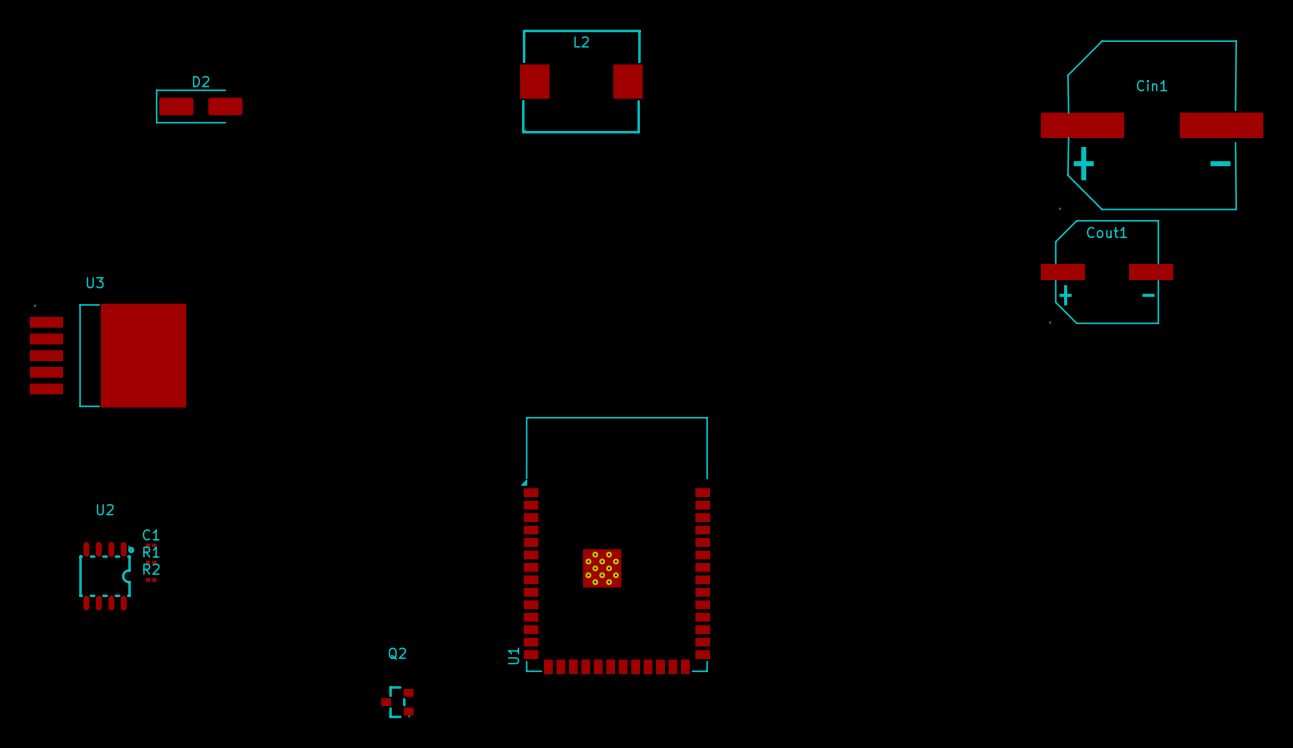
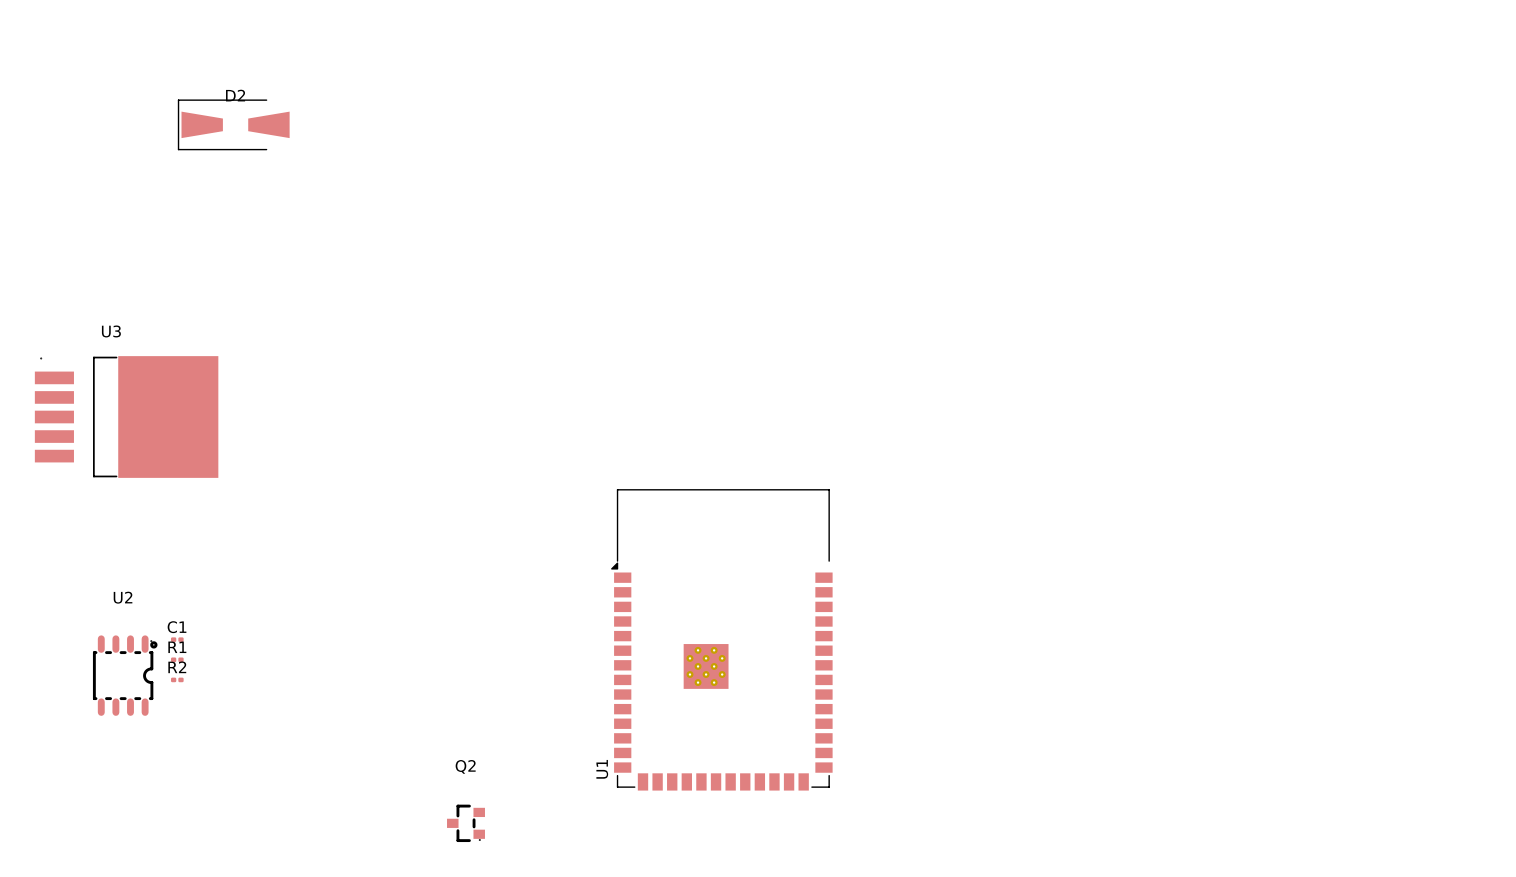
L2: (581, 81) -> none
D2 footprint: [156, 89, 243, 124] -> [177, 99, 290, 151]
Cin1: (1152, 125) -> none
Cout1: (1107, 272) -> none

